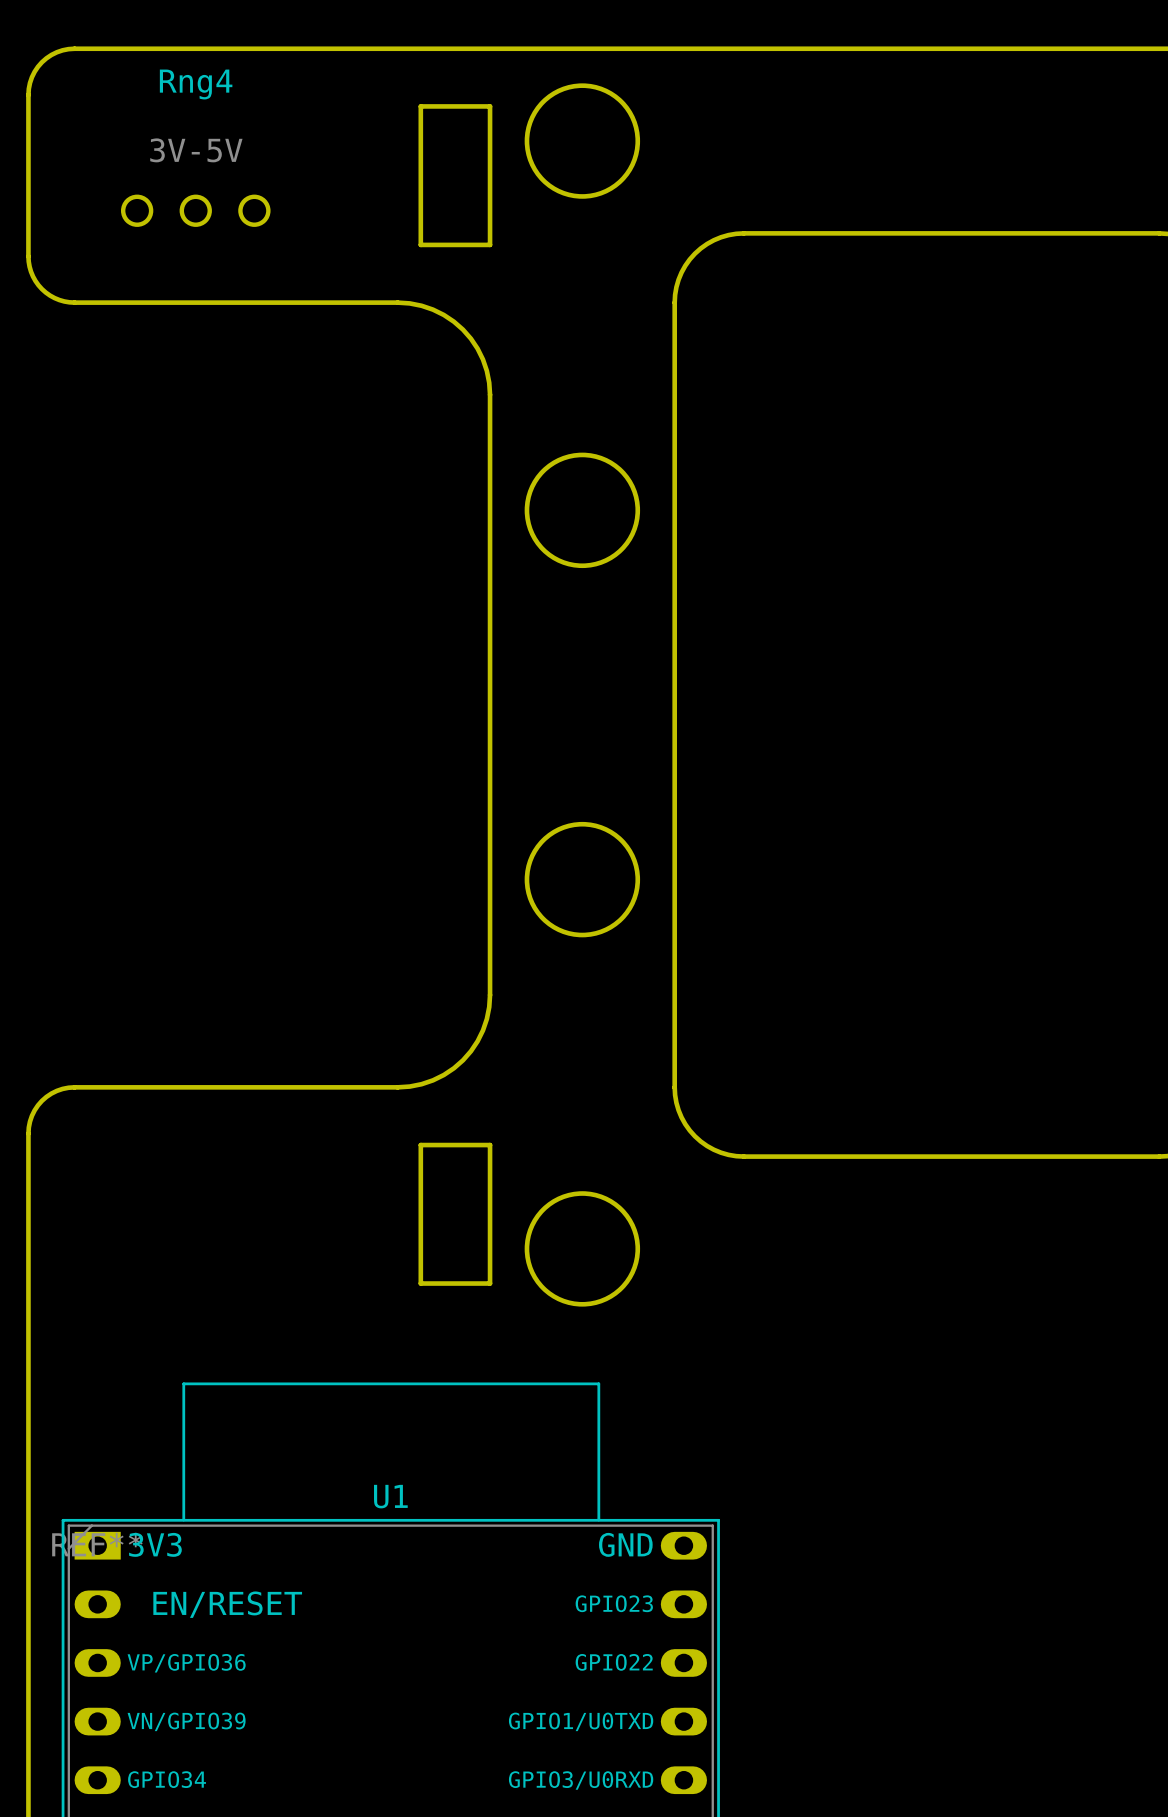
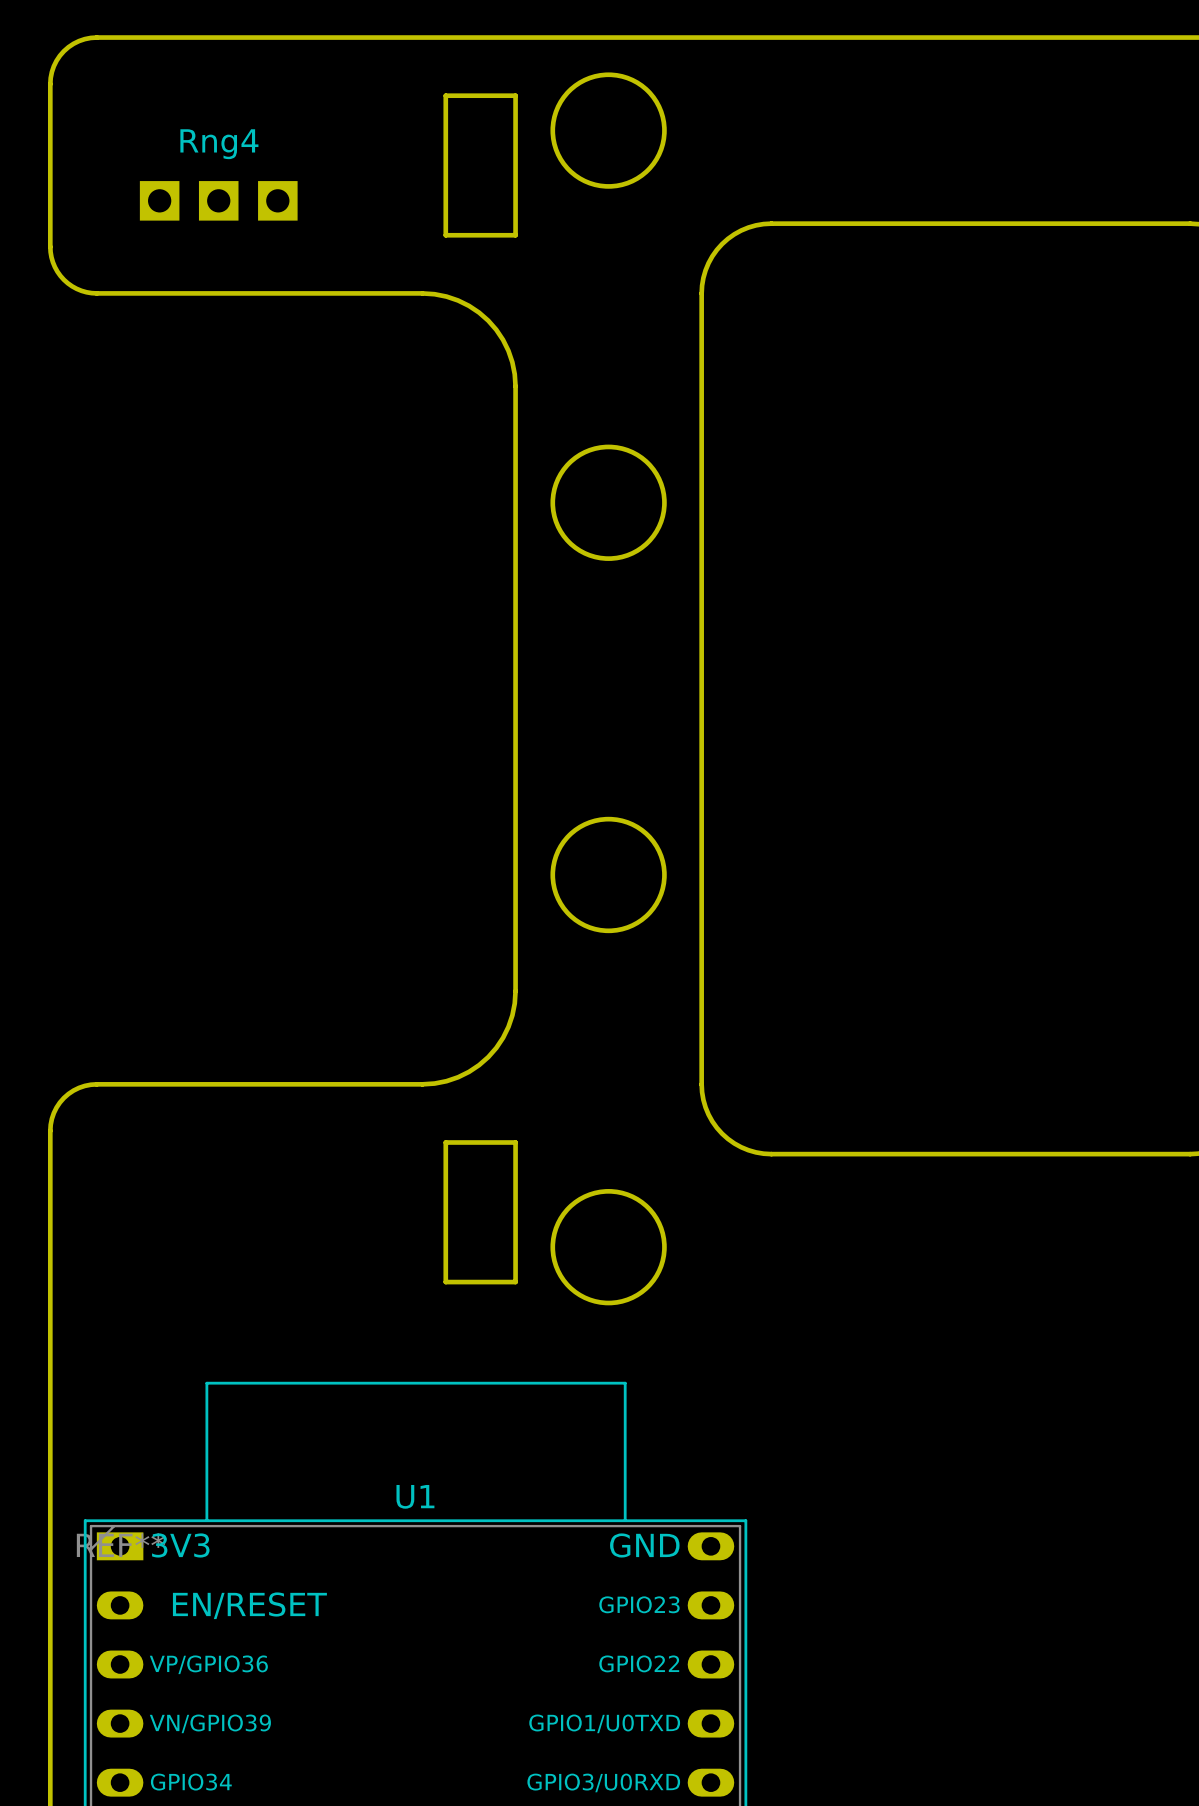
Rng4 name position: Rng4 (196, 84) -> Rng4 (219, 144)
Rng4 footprint: [120, 194, 271, 227] -> [139, 181, 298, 221]

